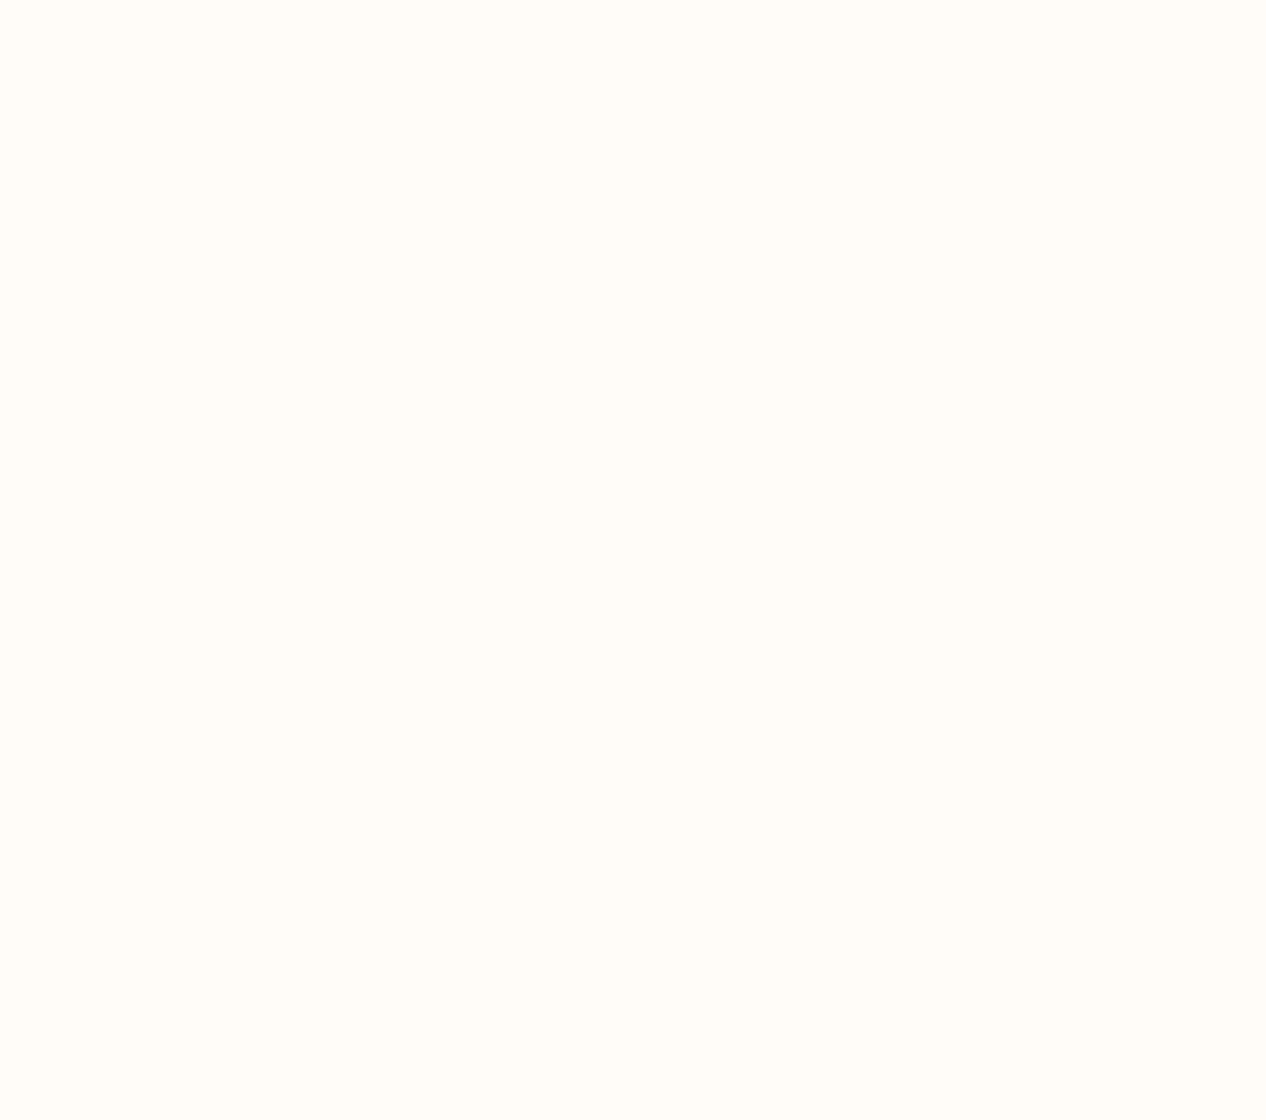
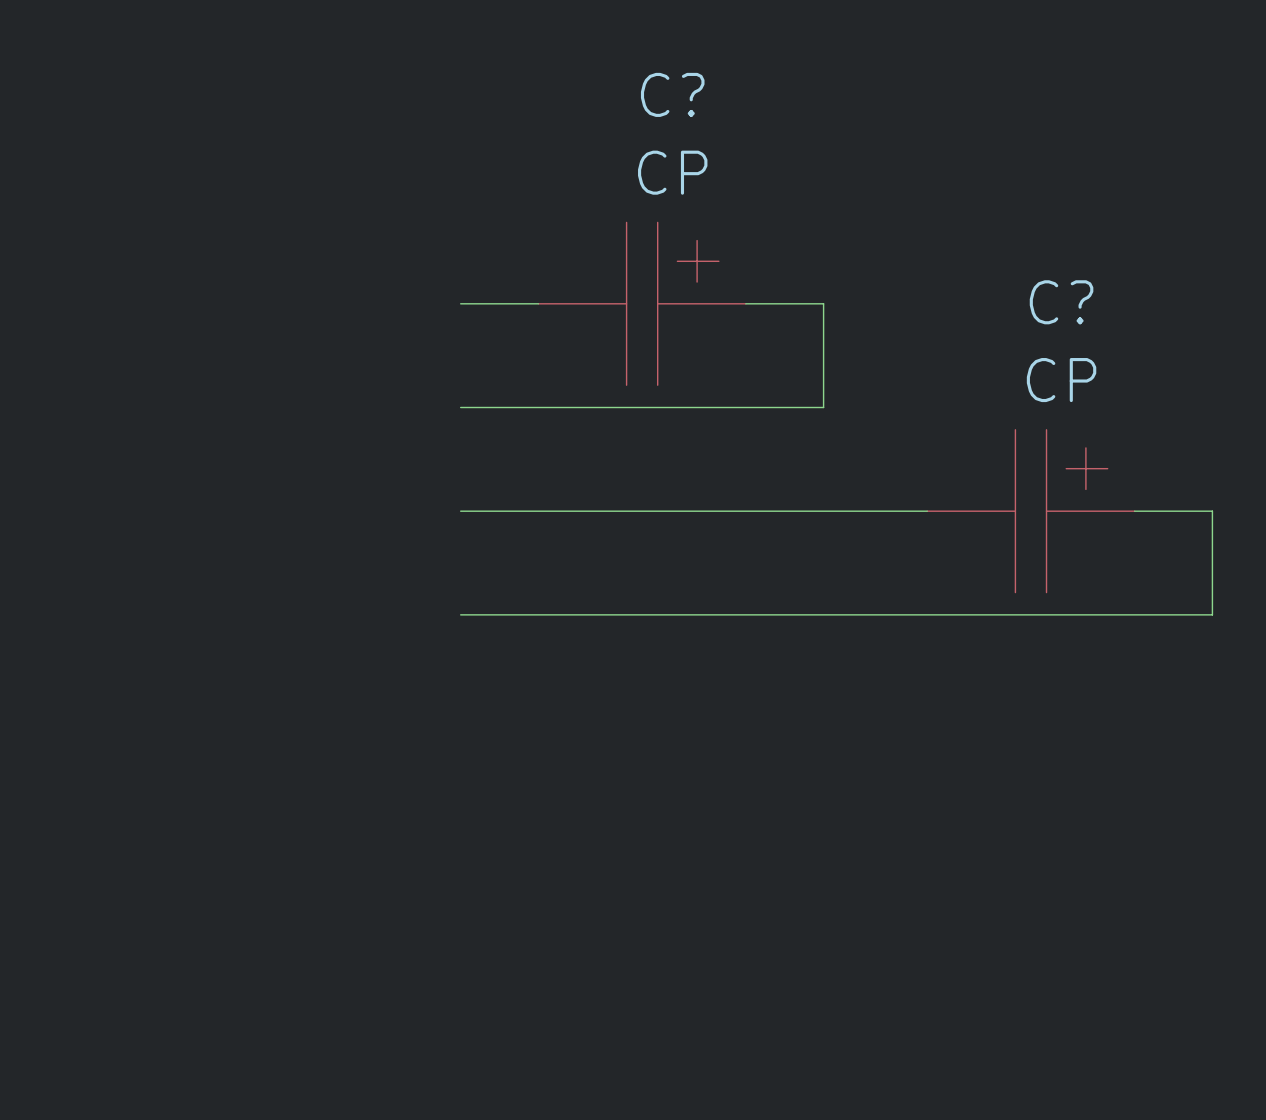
wire: none -> (460, 303) (538, 303)
C?: none -> CP (642, 303)
wire: none -> (745, 303) (823, 303) (823, 407) (460, 407)
wire: none -> (460, 511) (927, 511)
C?: none -> CP (1030, 511)
wire: none -> (1134, 511) (1212, 511) (1212, 614) (460, 614)

